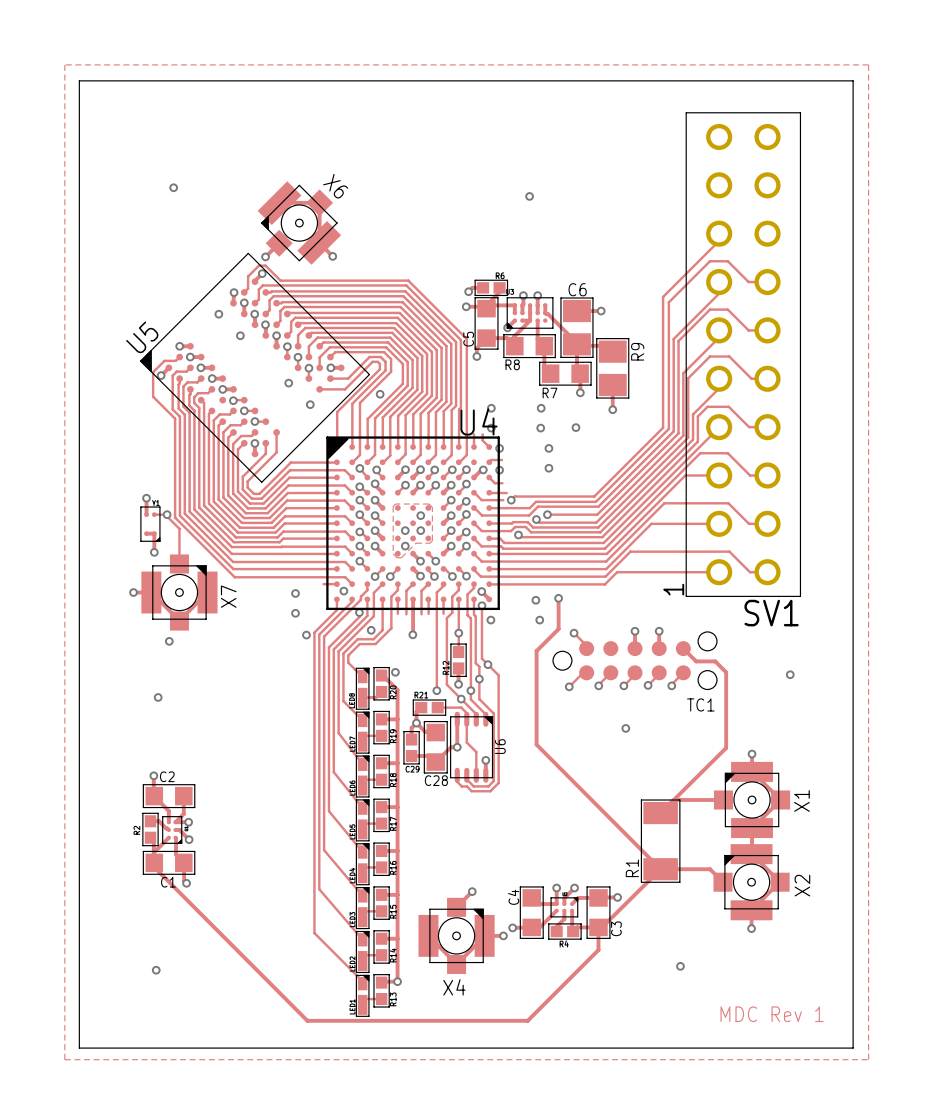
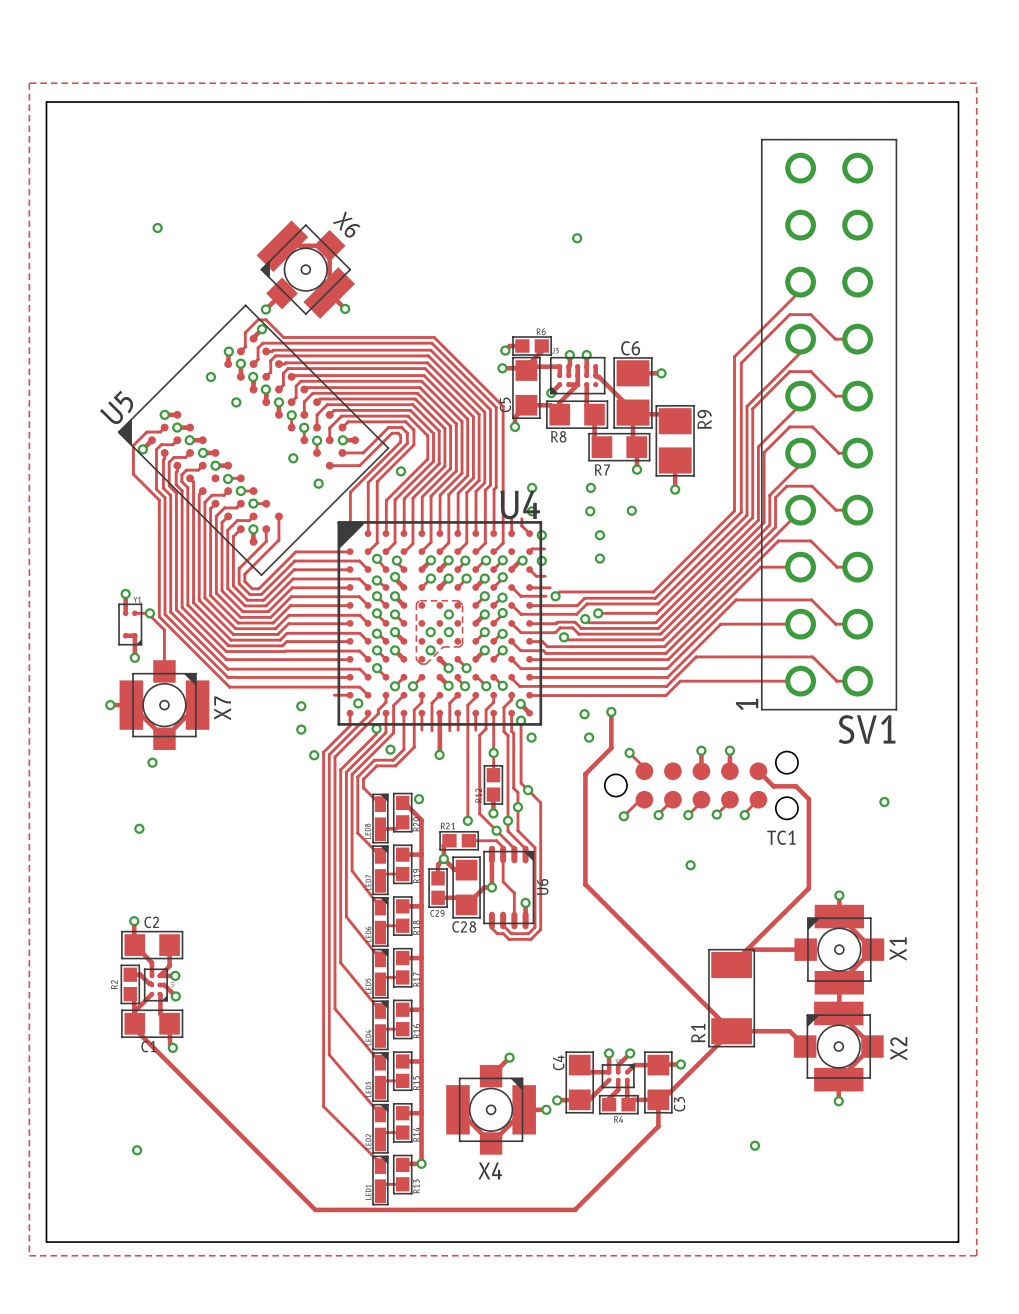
text: MDC Rev 1 (772, 1014) -> none

